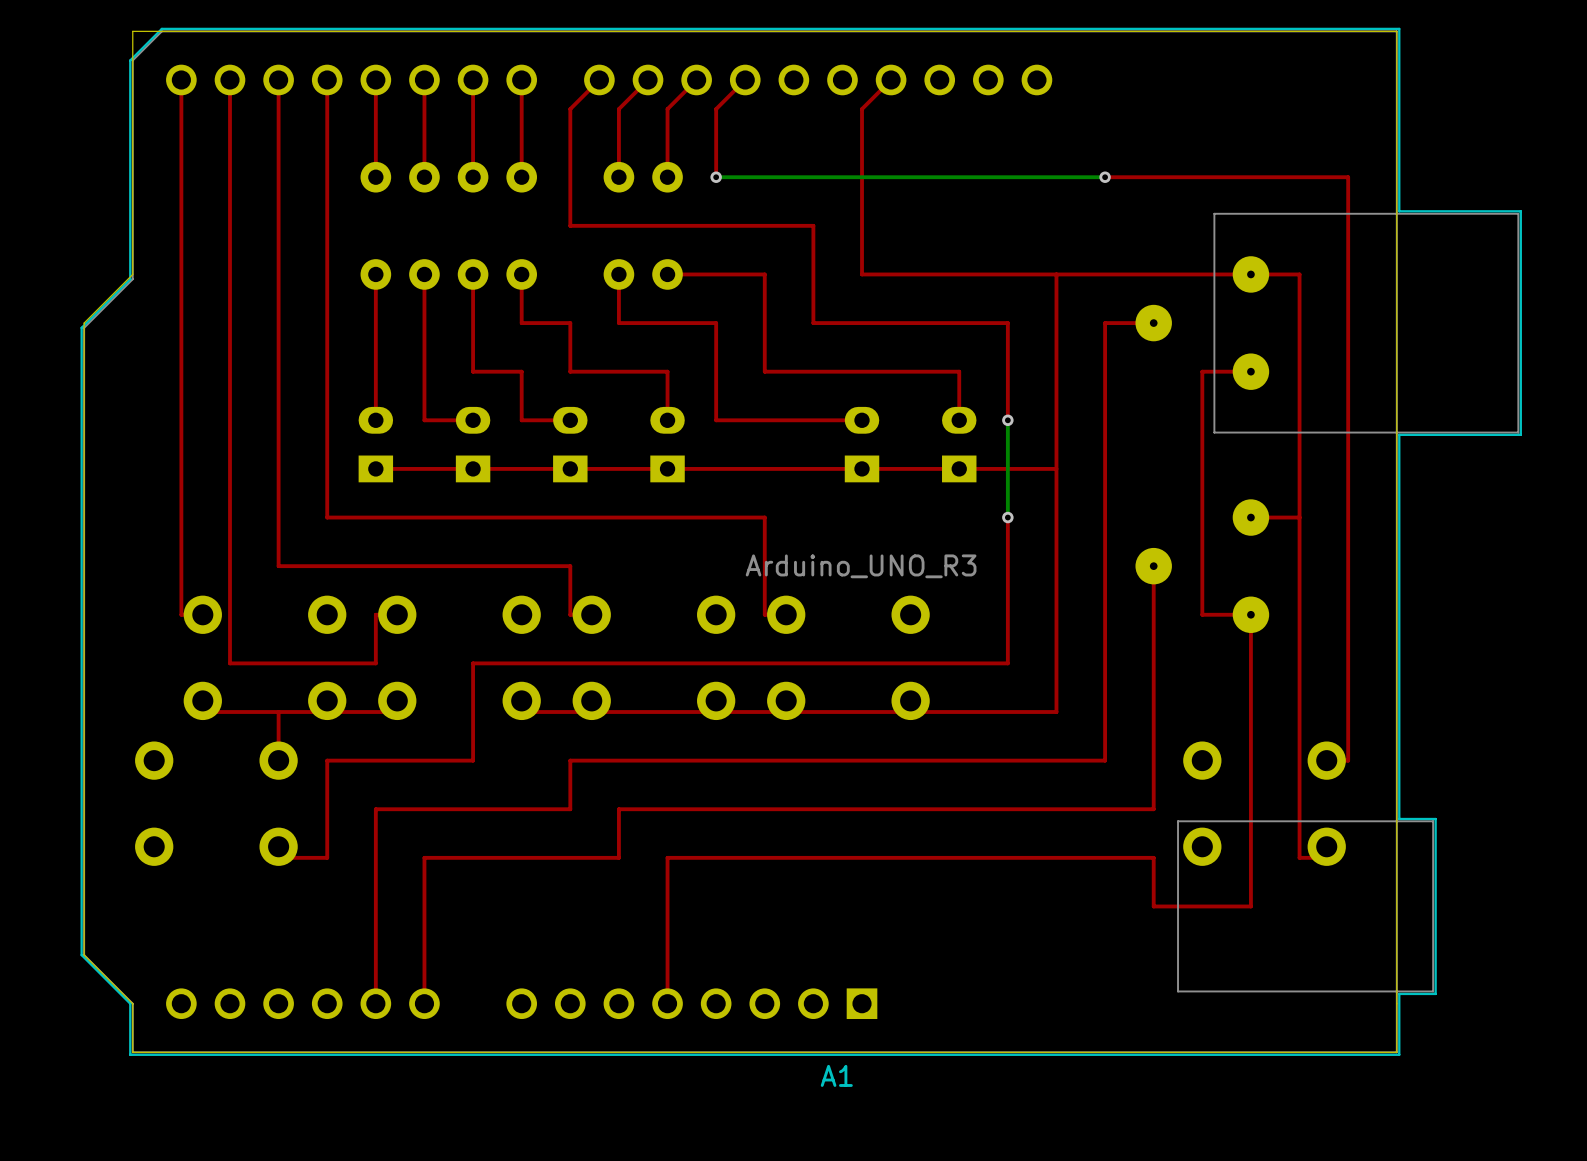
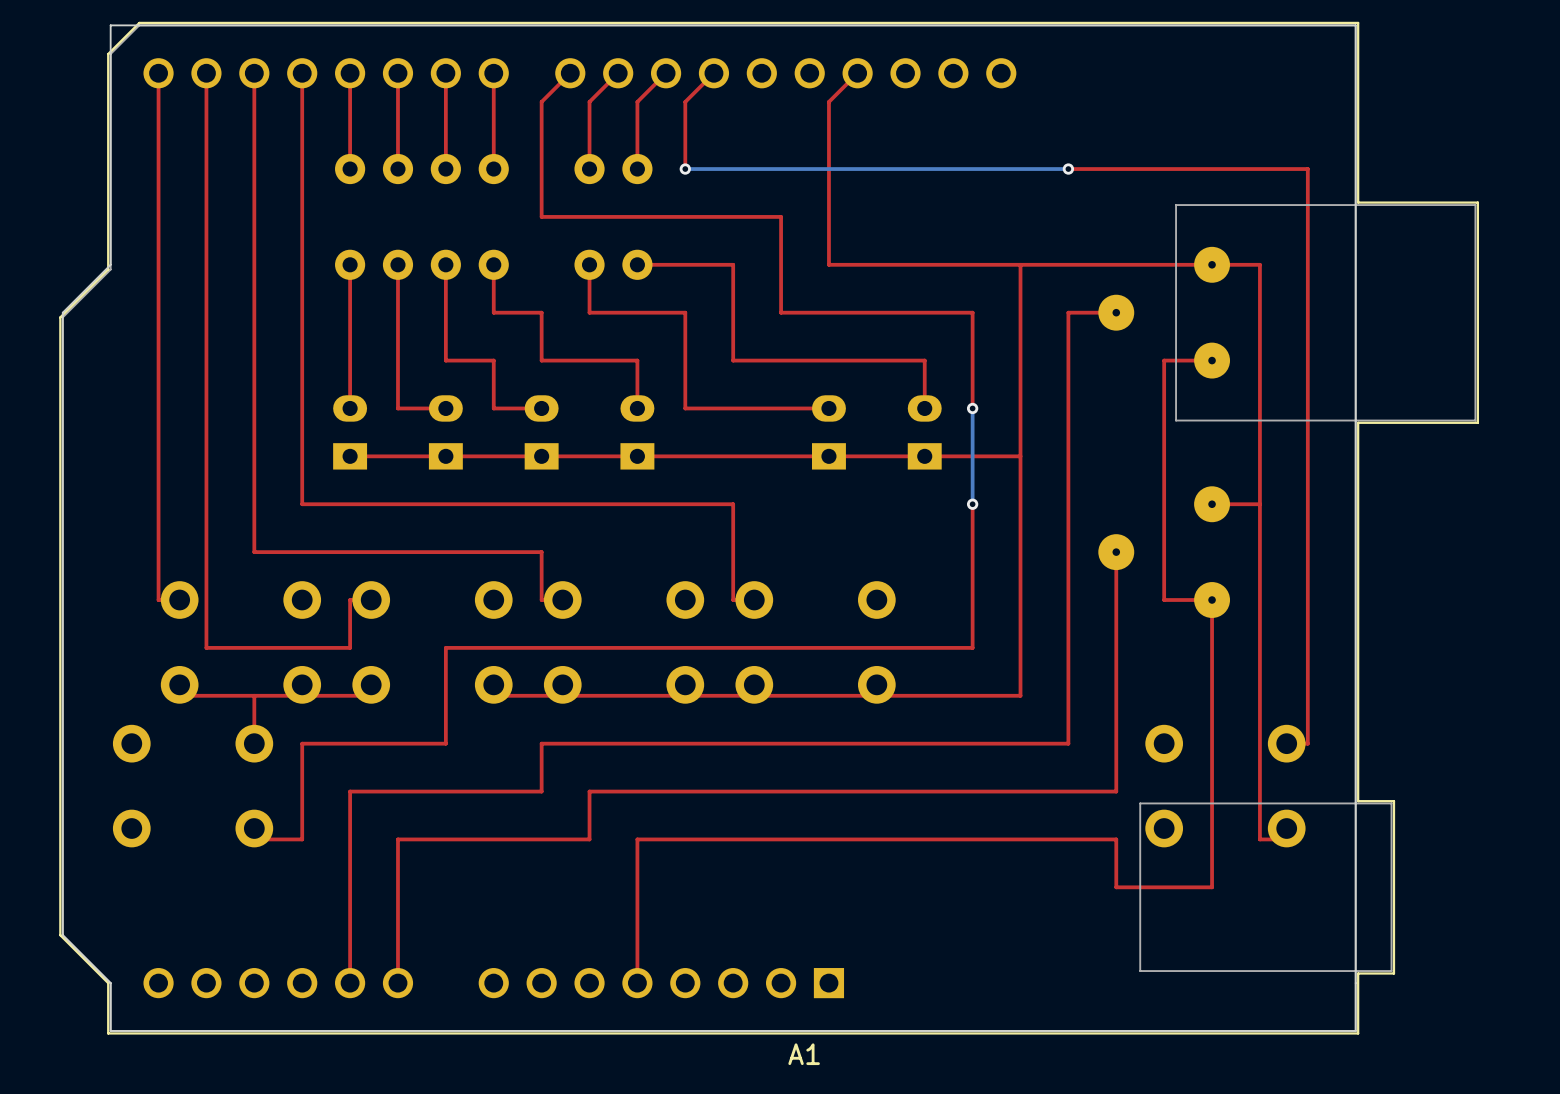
A1 value: Arduino_UNO_R3 (861, 566) -> none

